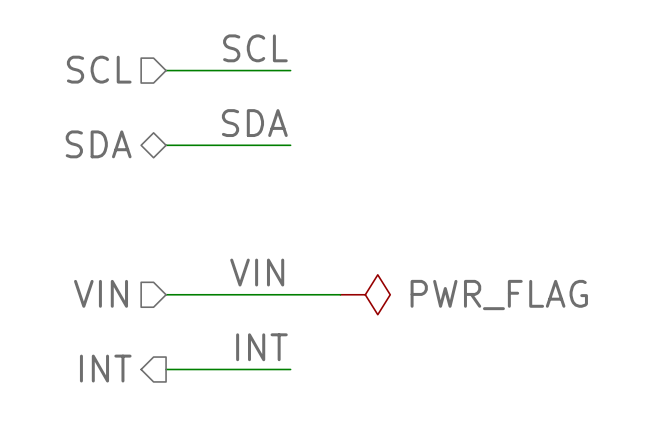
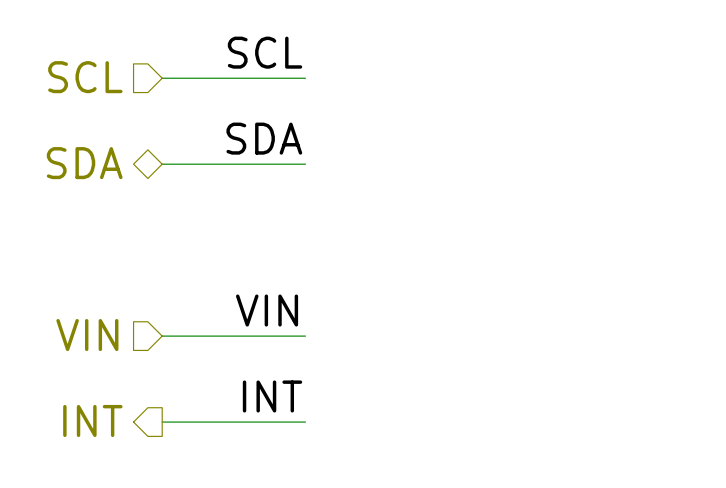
wire: (290, 294) (340, 294) -> none
power symbol: PWR_FLAG (365, 294) -> none

